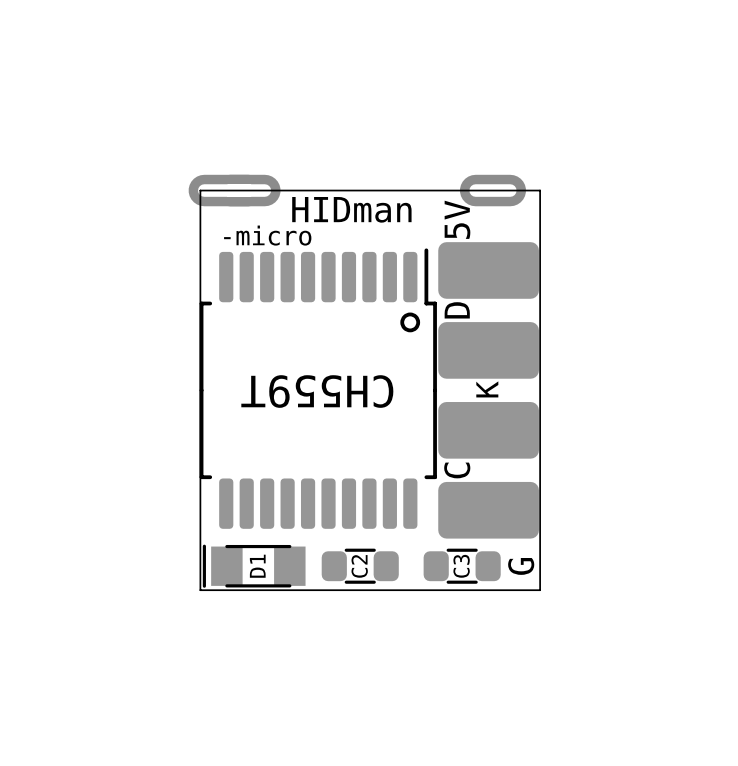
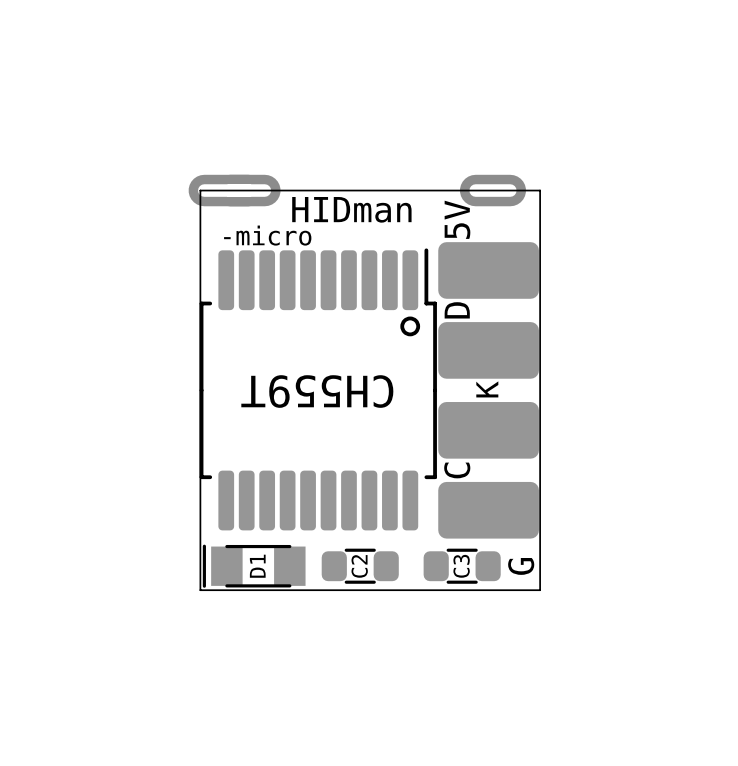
part footprint: [199, 248, 437, 529] -> [199, 248, 437, 531]

